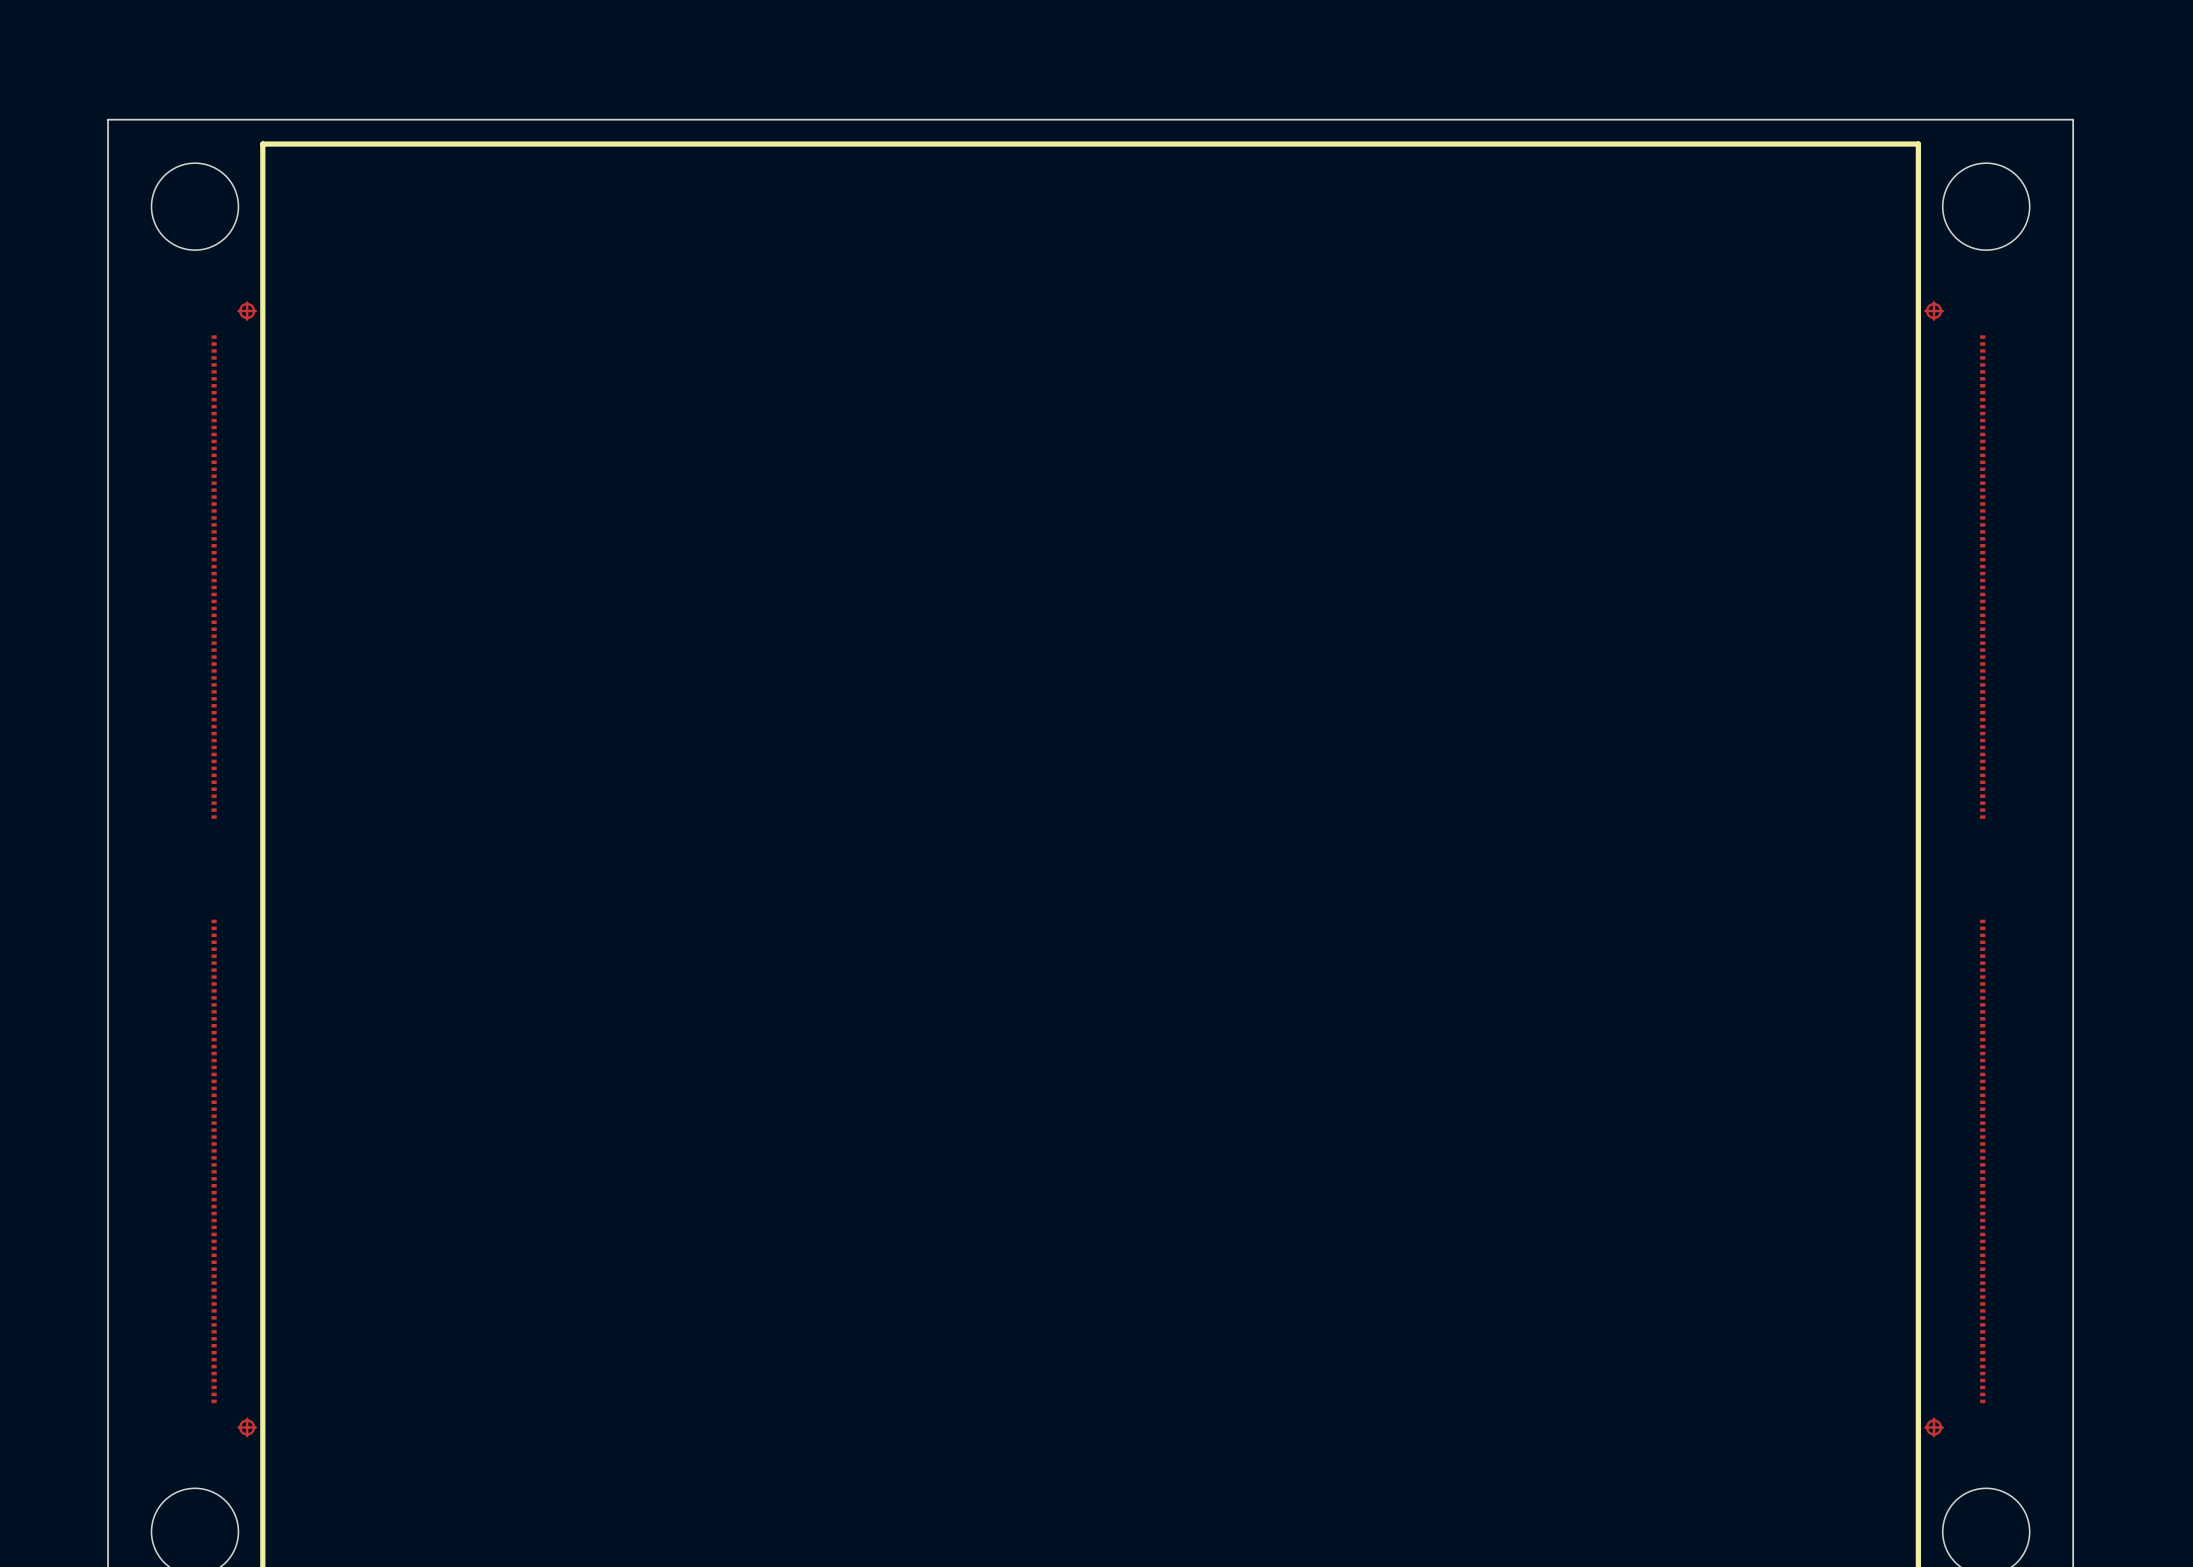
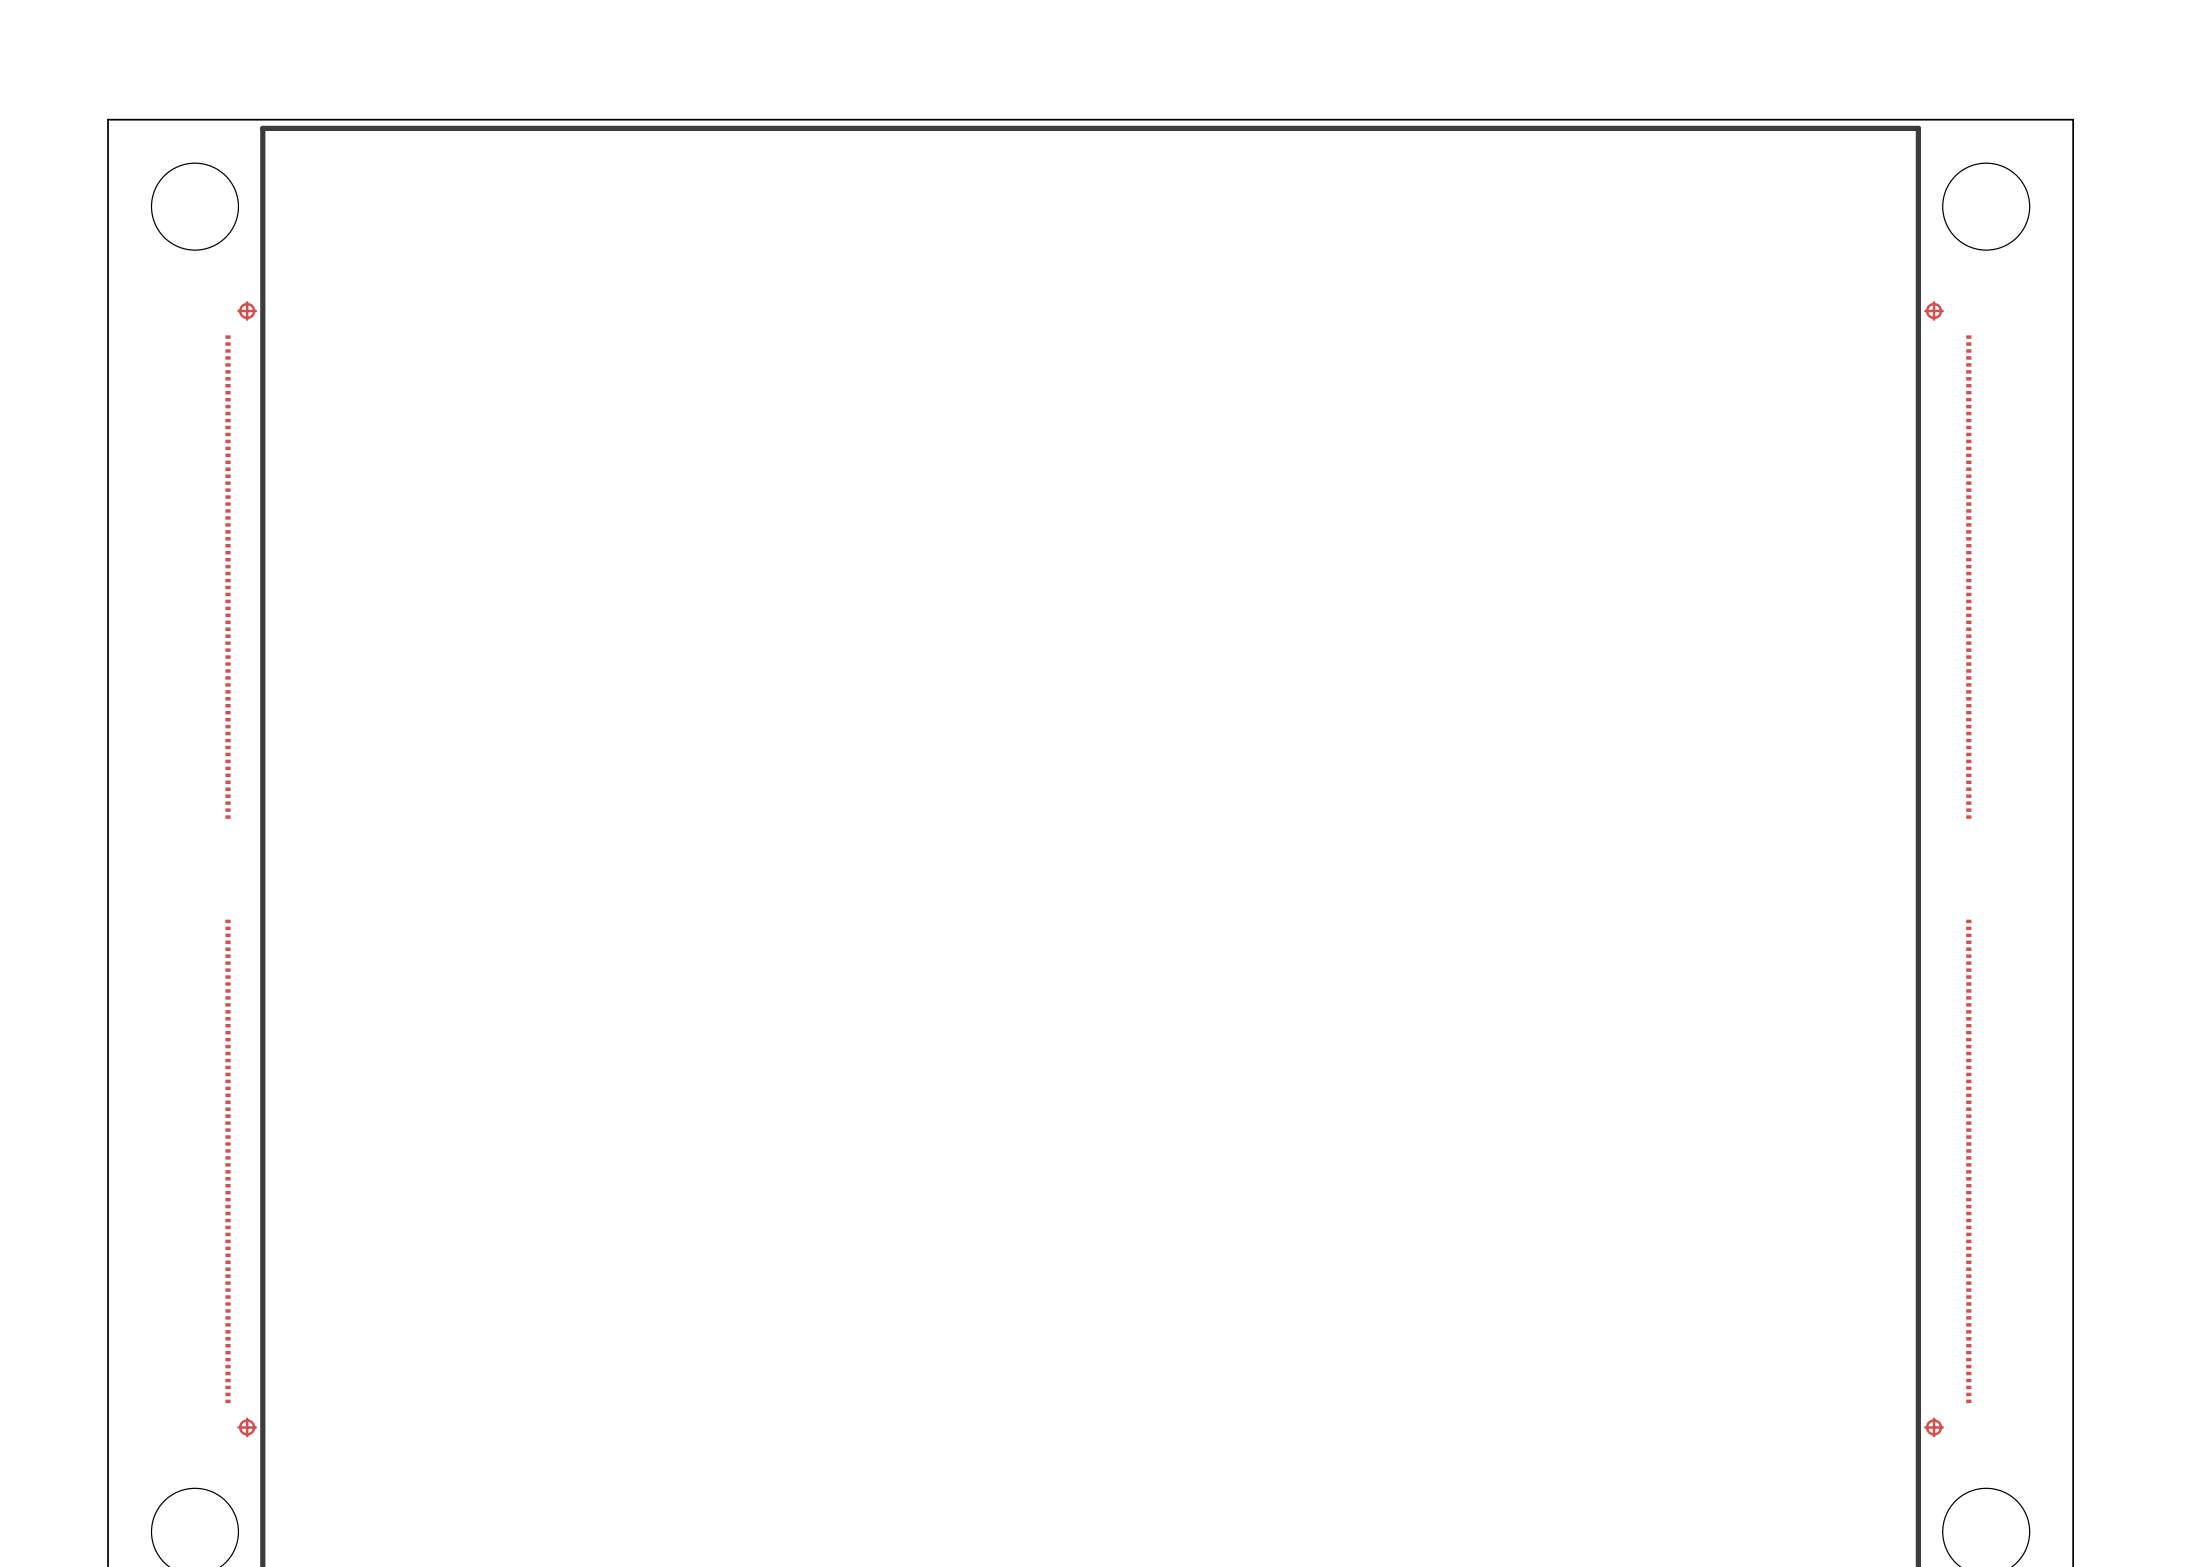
line: (262, 144) (1918, 144) -> (262, 144) (262, 128) (1918, 128) (1918, 144)
part position: (214, 577) -> (228, 577)
part position: (1982, 577) -> (1968, 577)
part position: (214, 1161) -> (228, 1161)
part position: (1982, 1161) -> (1968, 1161)

